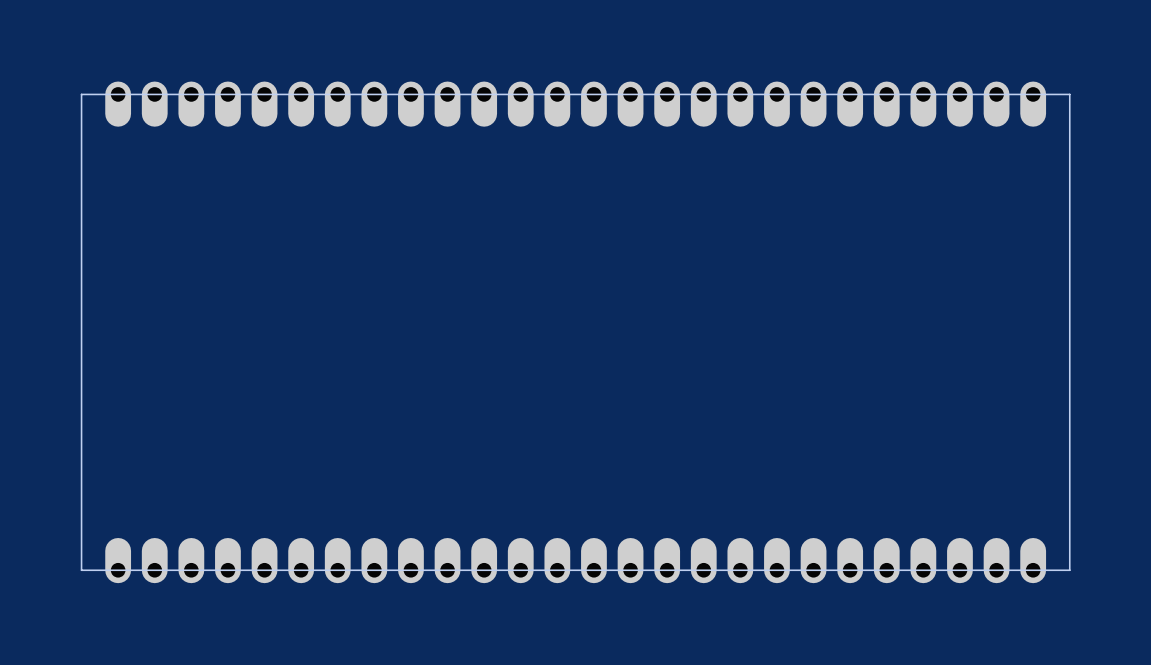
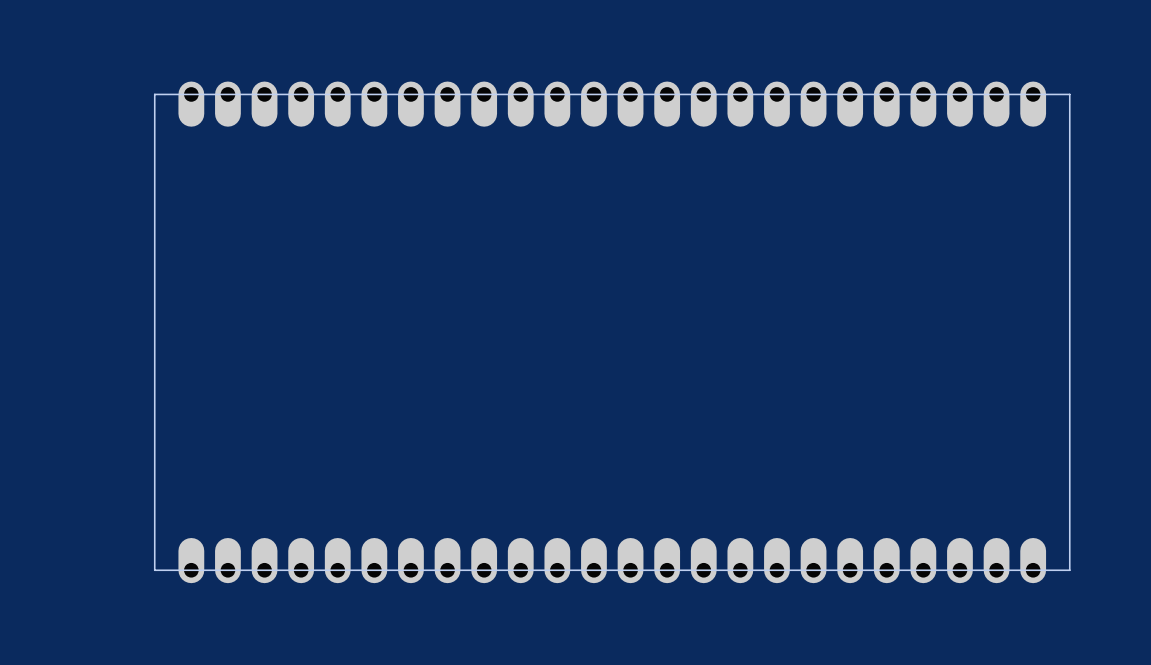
board edge: (154, 94) (81, 94) (81, 570) (154, 570) -> (154, 94) (154, 570)
part position: (246, 104) -> (319, 104)
part position: (246, 560) -> (319, 560)

